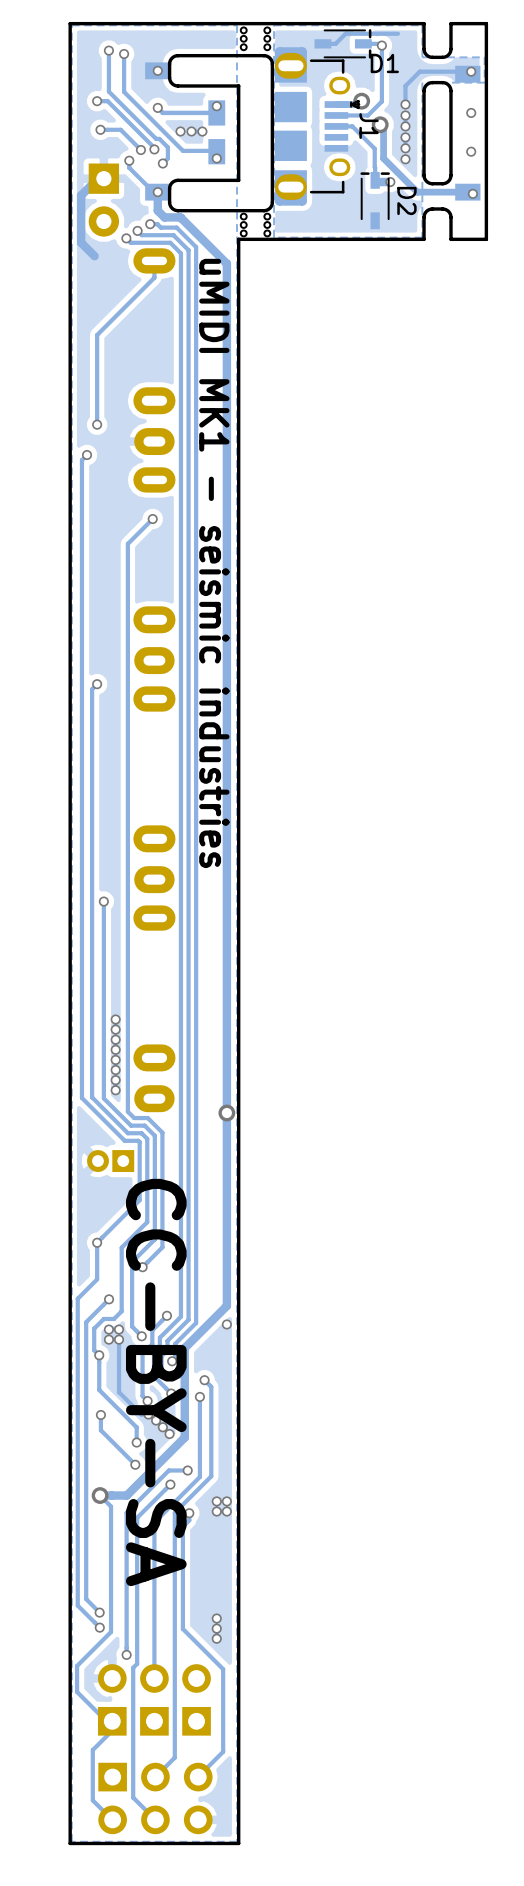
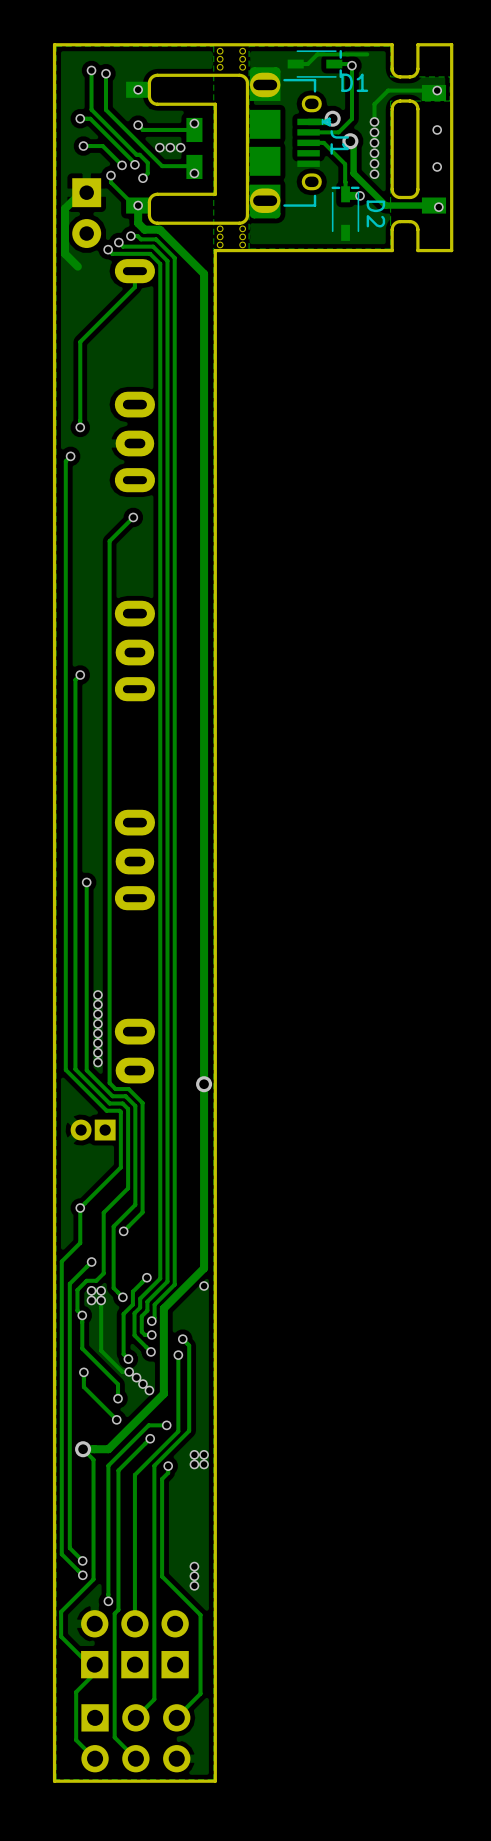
text: uMIDI MK1 - seismic industries (214, 563) -> none
text: CC-BY-SA (156, 1382) -> none

